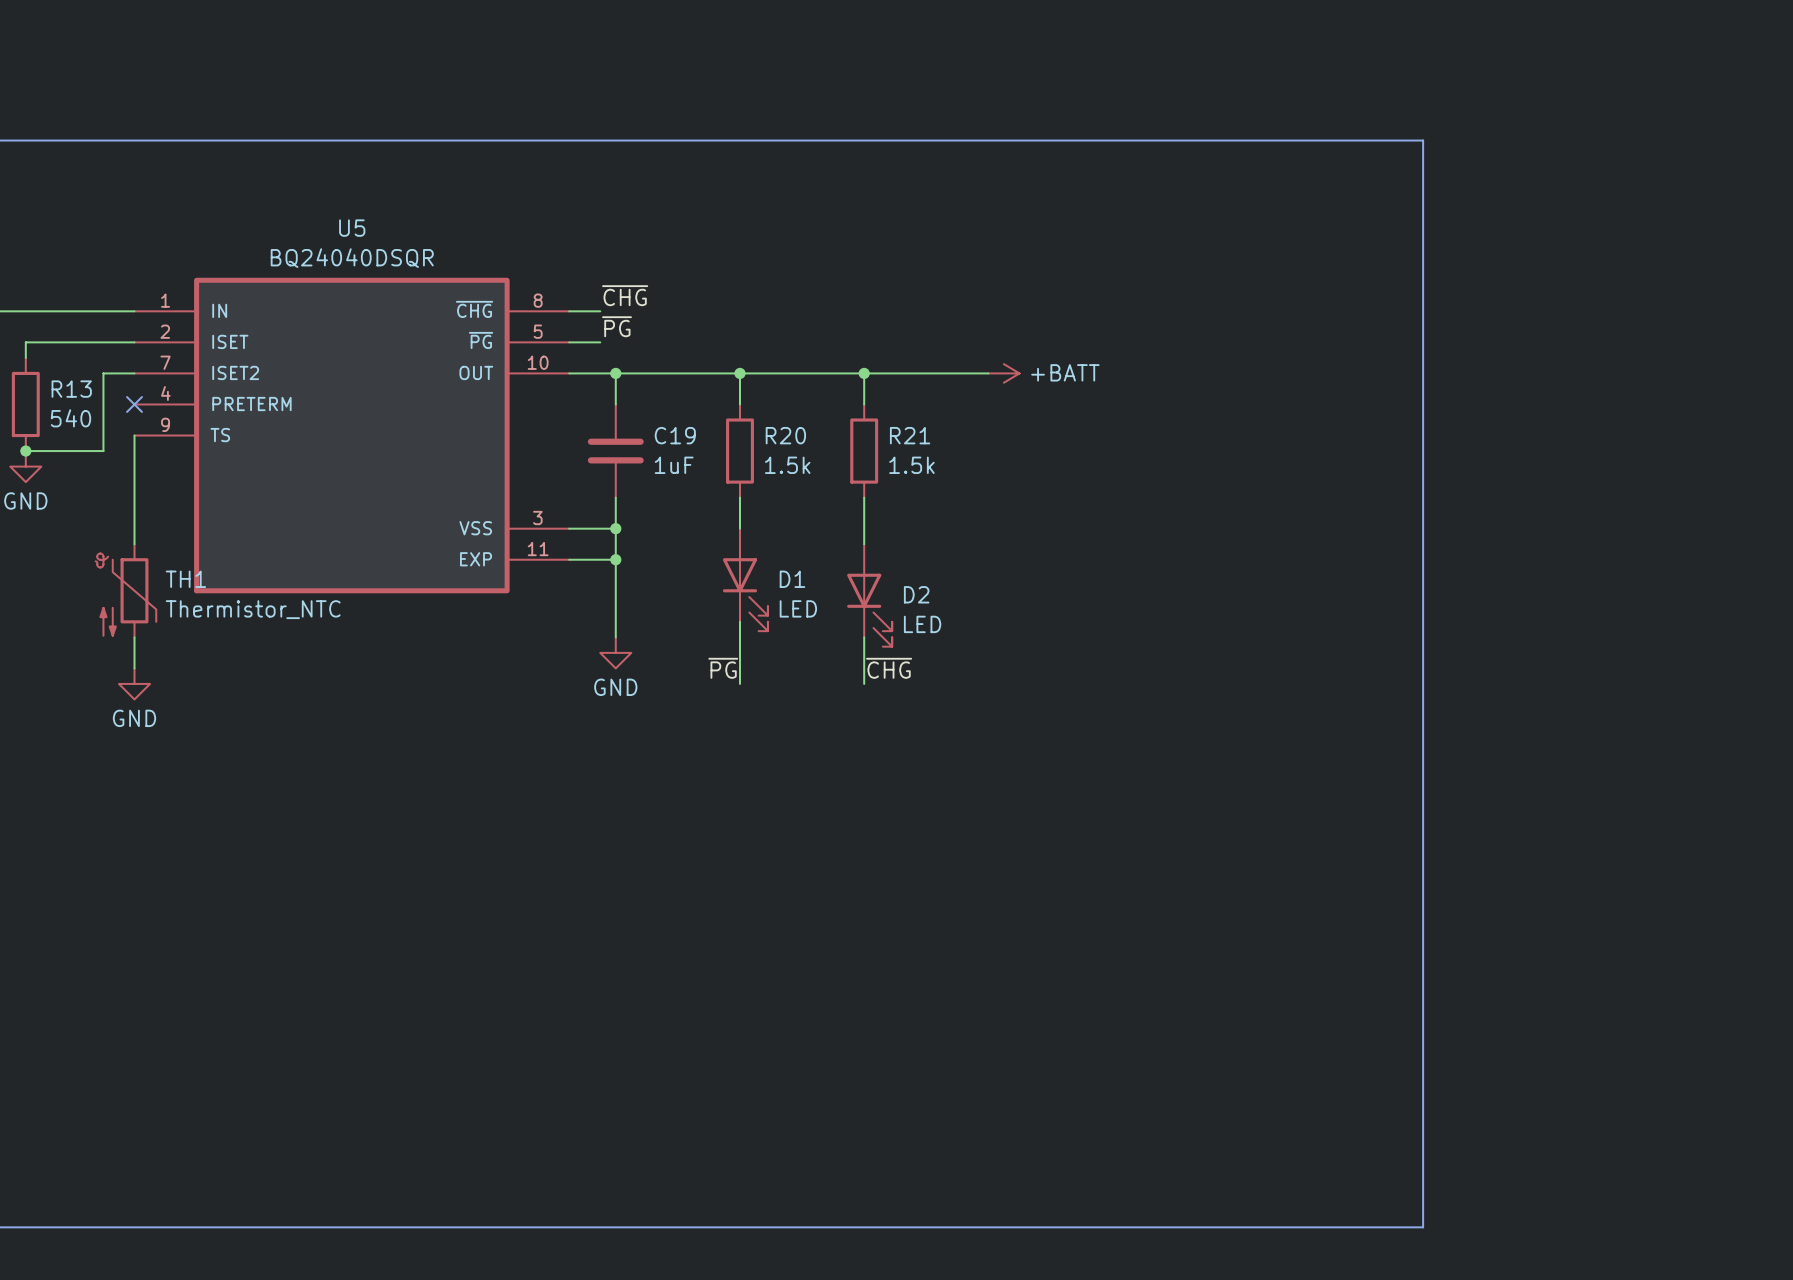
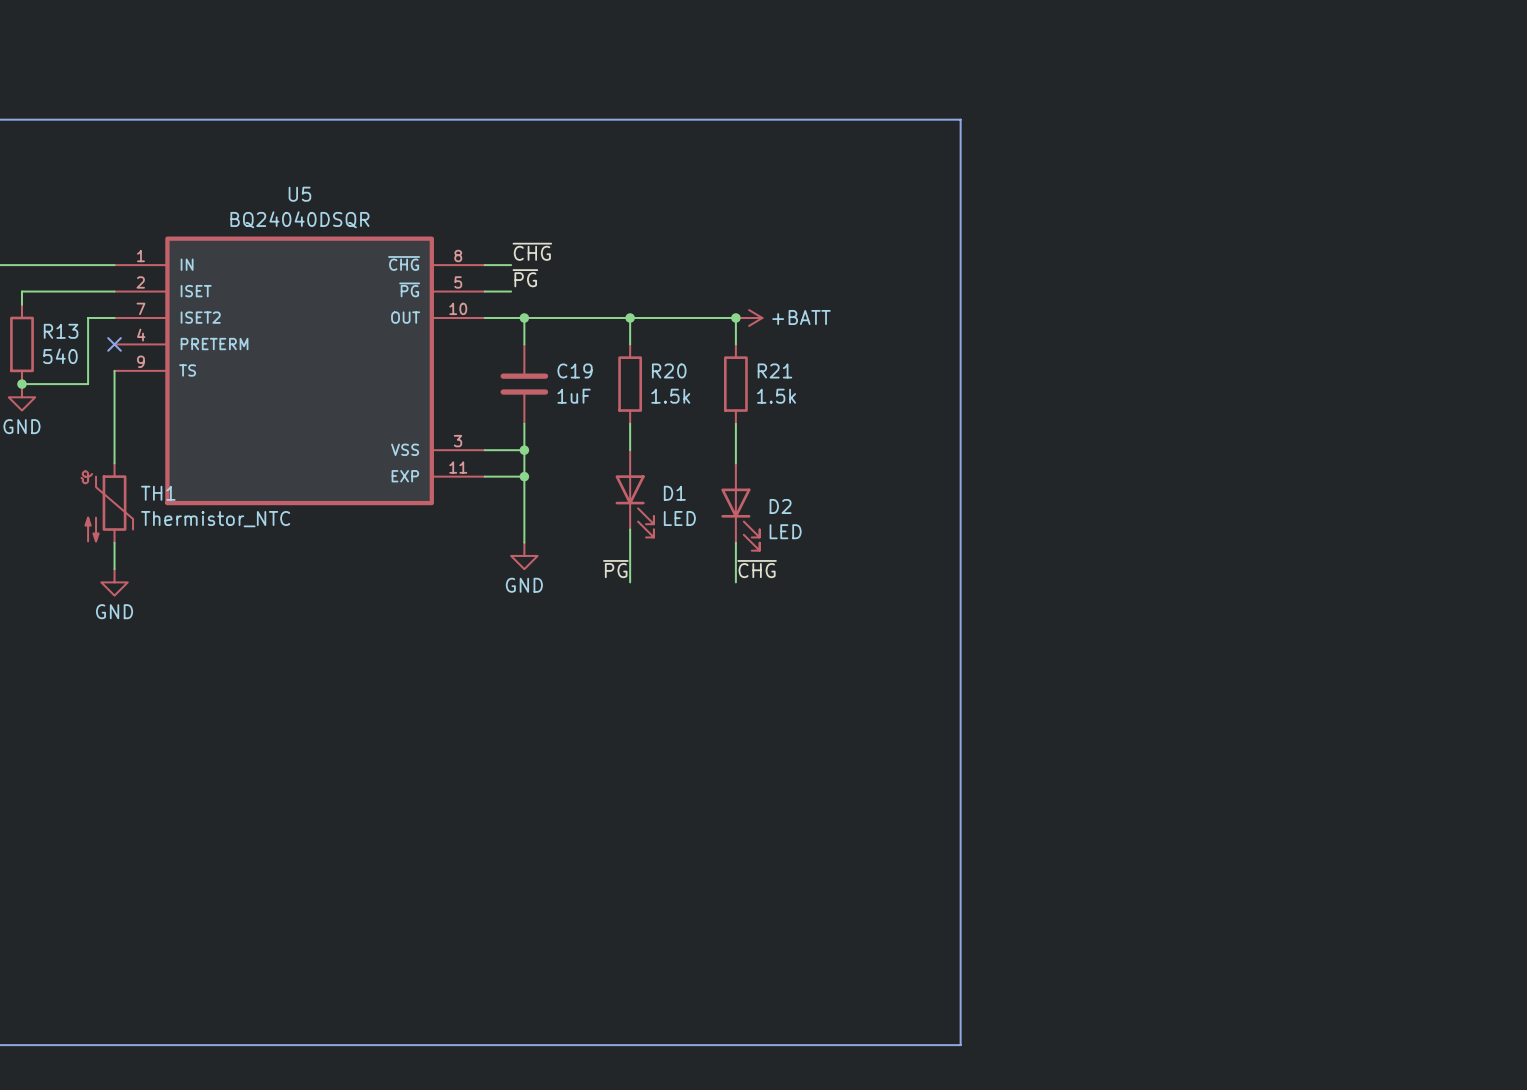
line: (1128, 140) (1423, 140) (1423, 1227) (1128, 1227) -> (960, 119) (960, 1045)
wire: (864, 373) (988, 373) -> none
power symbol position: +BATT (1003, 373) -> +BATT (749, 317)

